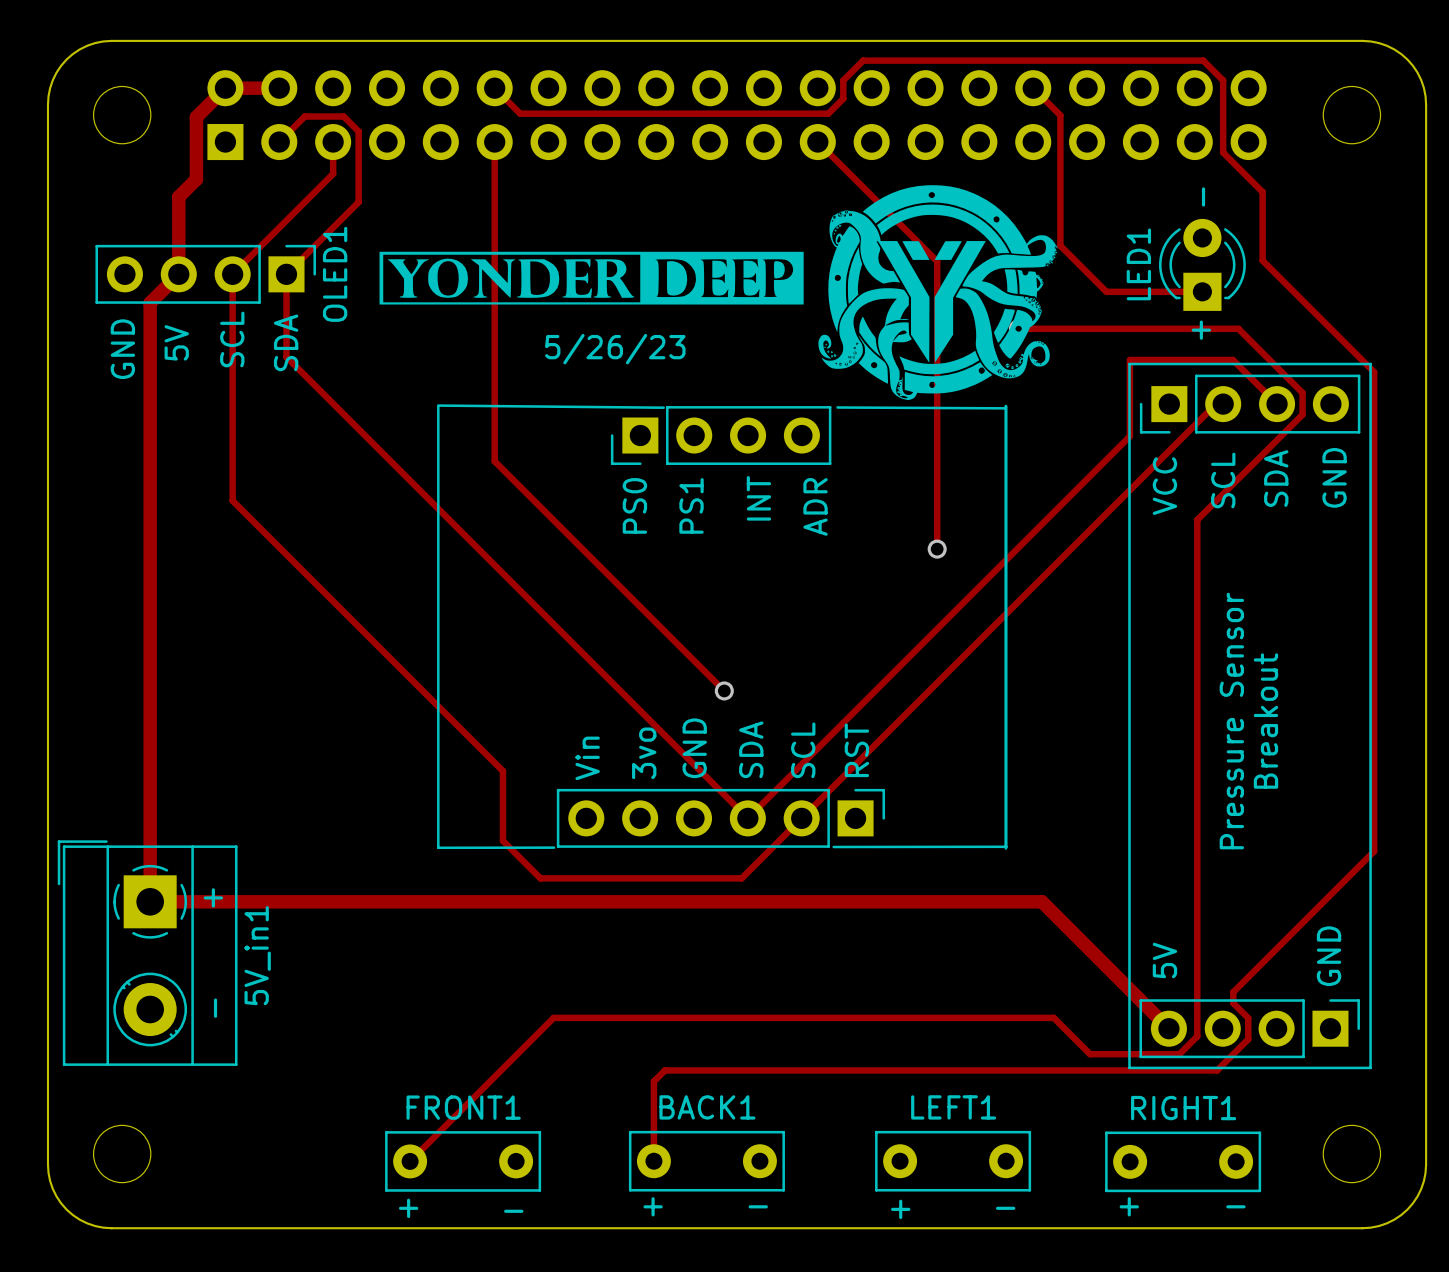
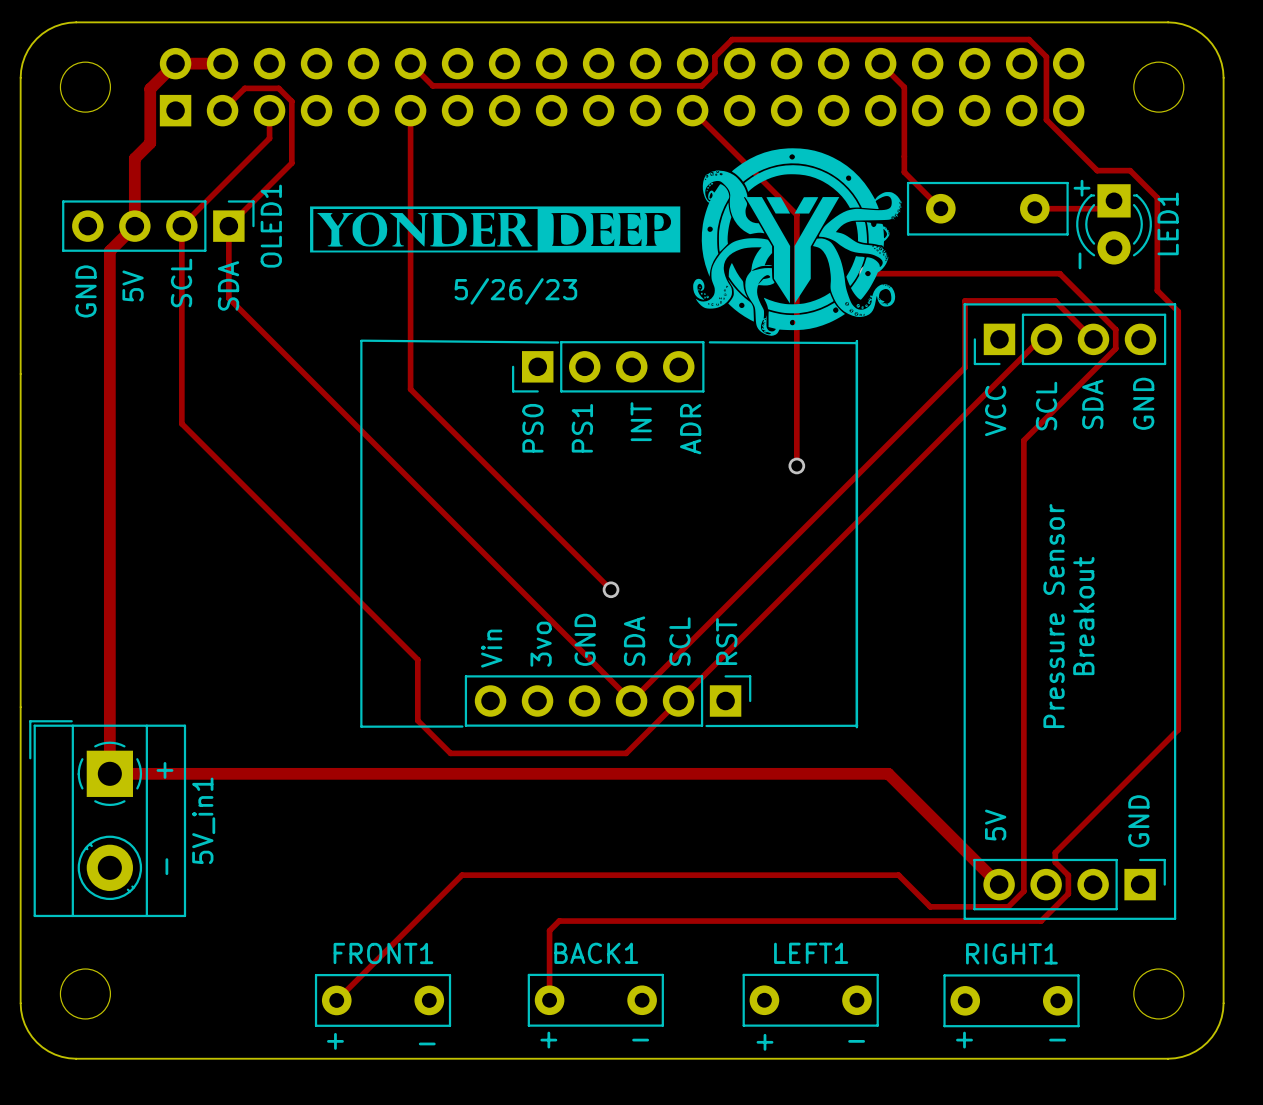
track: (1262, 192) (1262, 260) (1350, 348) -> (1080, 154) (1097, 170) (1130, 170) (1157, 197) (1157, 290)
text position: - (1203, 196) -> - (1080, 260)
track: (1060, 212) (1060, 245) (1106, 291) (1202, 291) -> (904, 172) (940, 208)
track: none -> (1114, 200) (1106, 208) (1034, 208)
part: none -> (987, 208)
LED1 rotation: 0° (1202, 264) -> 180° (1114, 224)
LED1 position: (1202, 264) -> (1114, 224)
text position: + (1201, 330) -> + (1082, 188)

